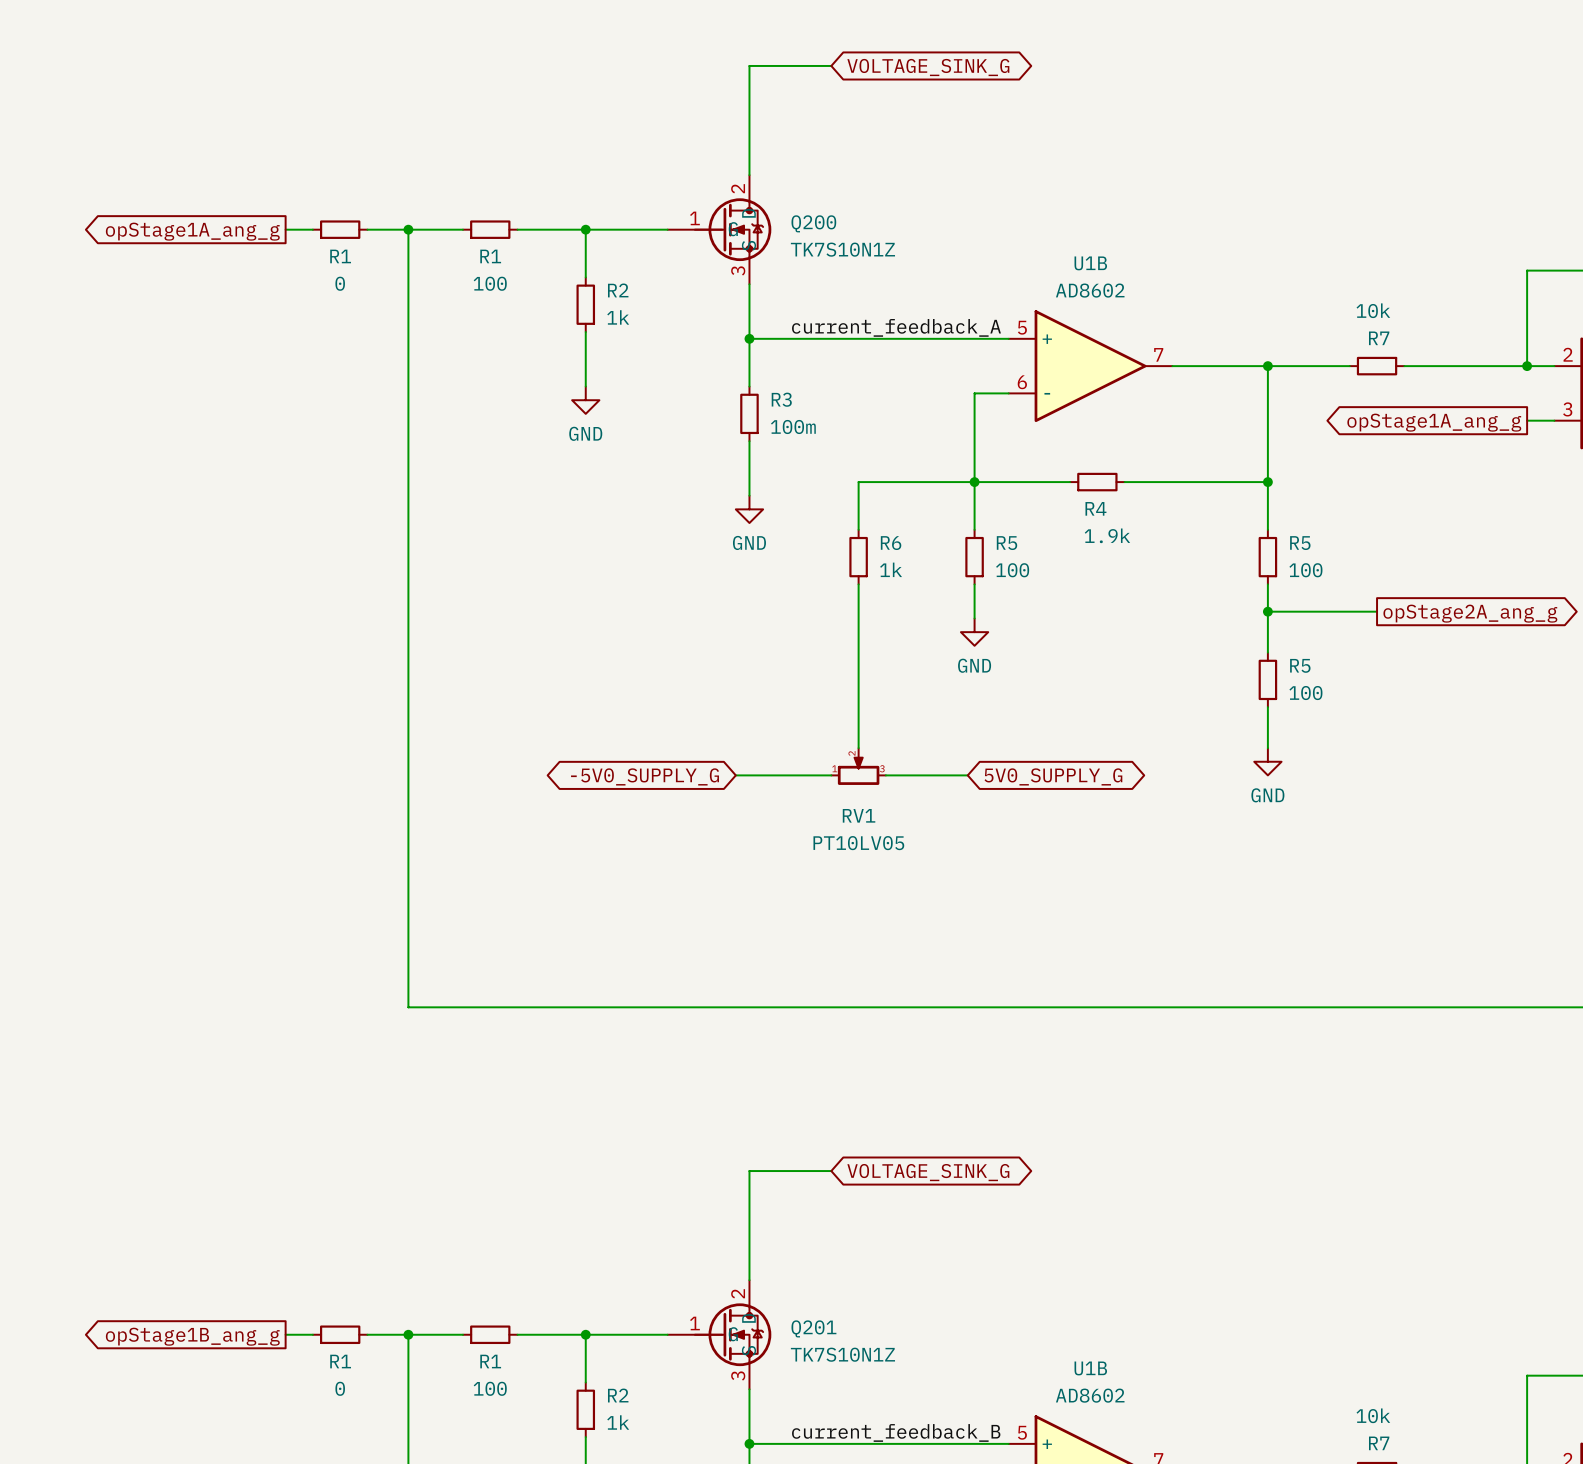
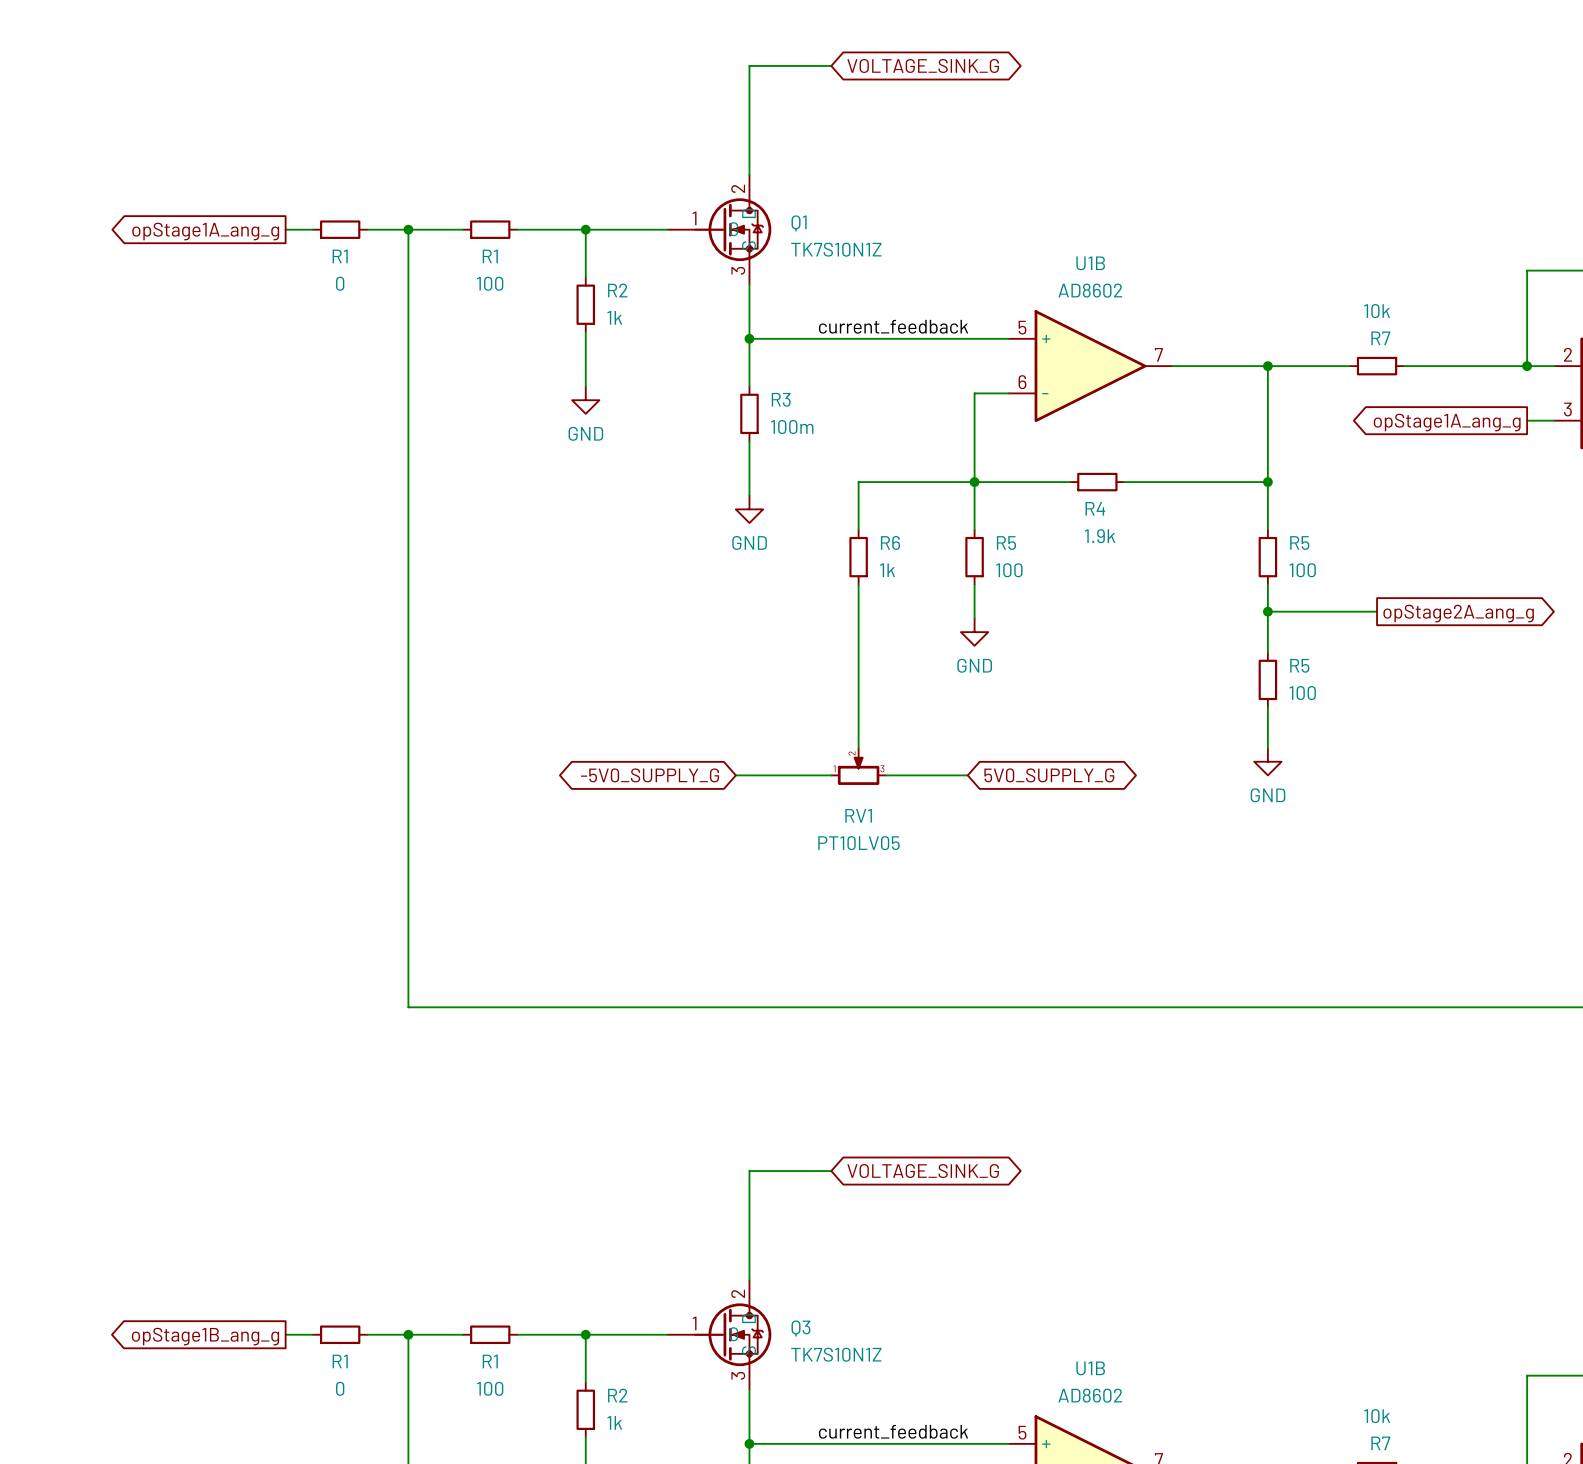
Q200 name: Q200 (813, 223) -> Q1 (799, 223)
label: current_feedback_A (896, 327) -> current_feedback (893, 326)
Q201 name: Q201 (813, 1328) -> Q3 (800, 1328)
label: current_feedback_B (896, 1432) -> current_feedback (893, 1431)

